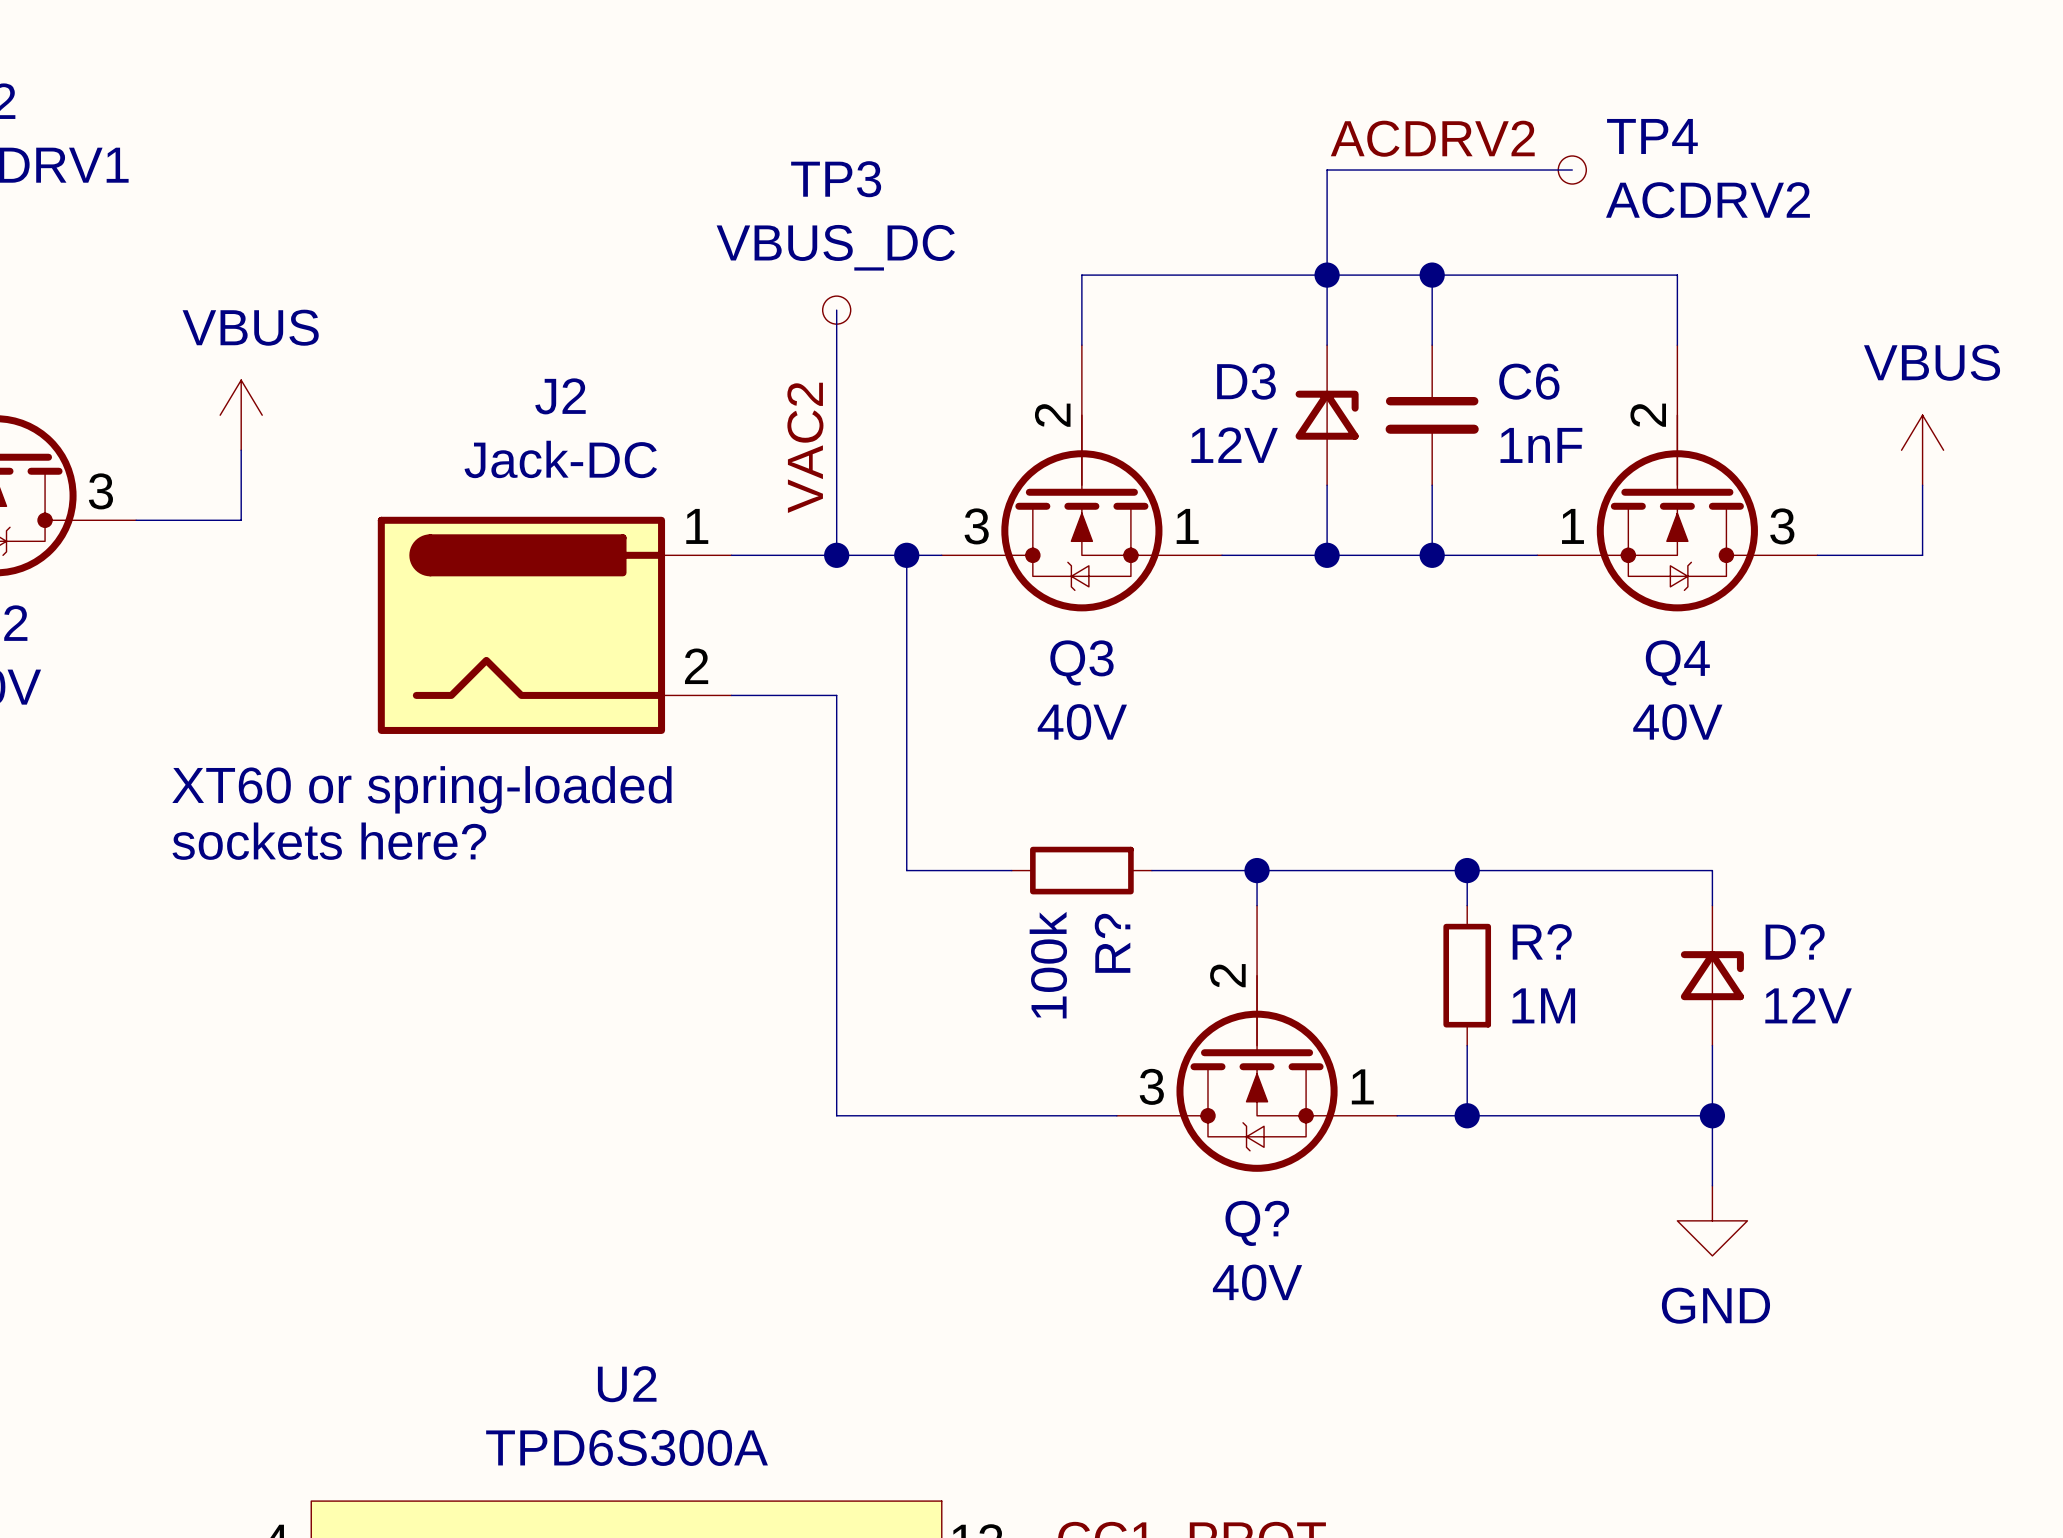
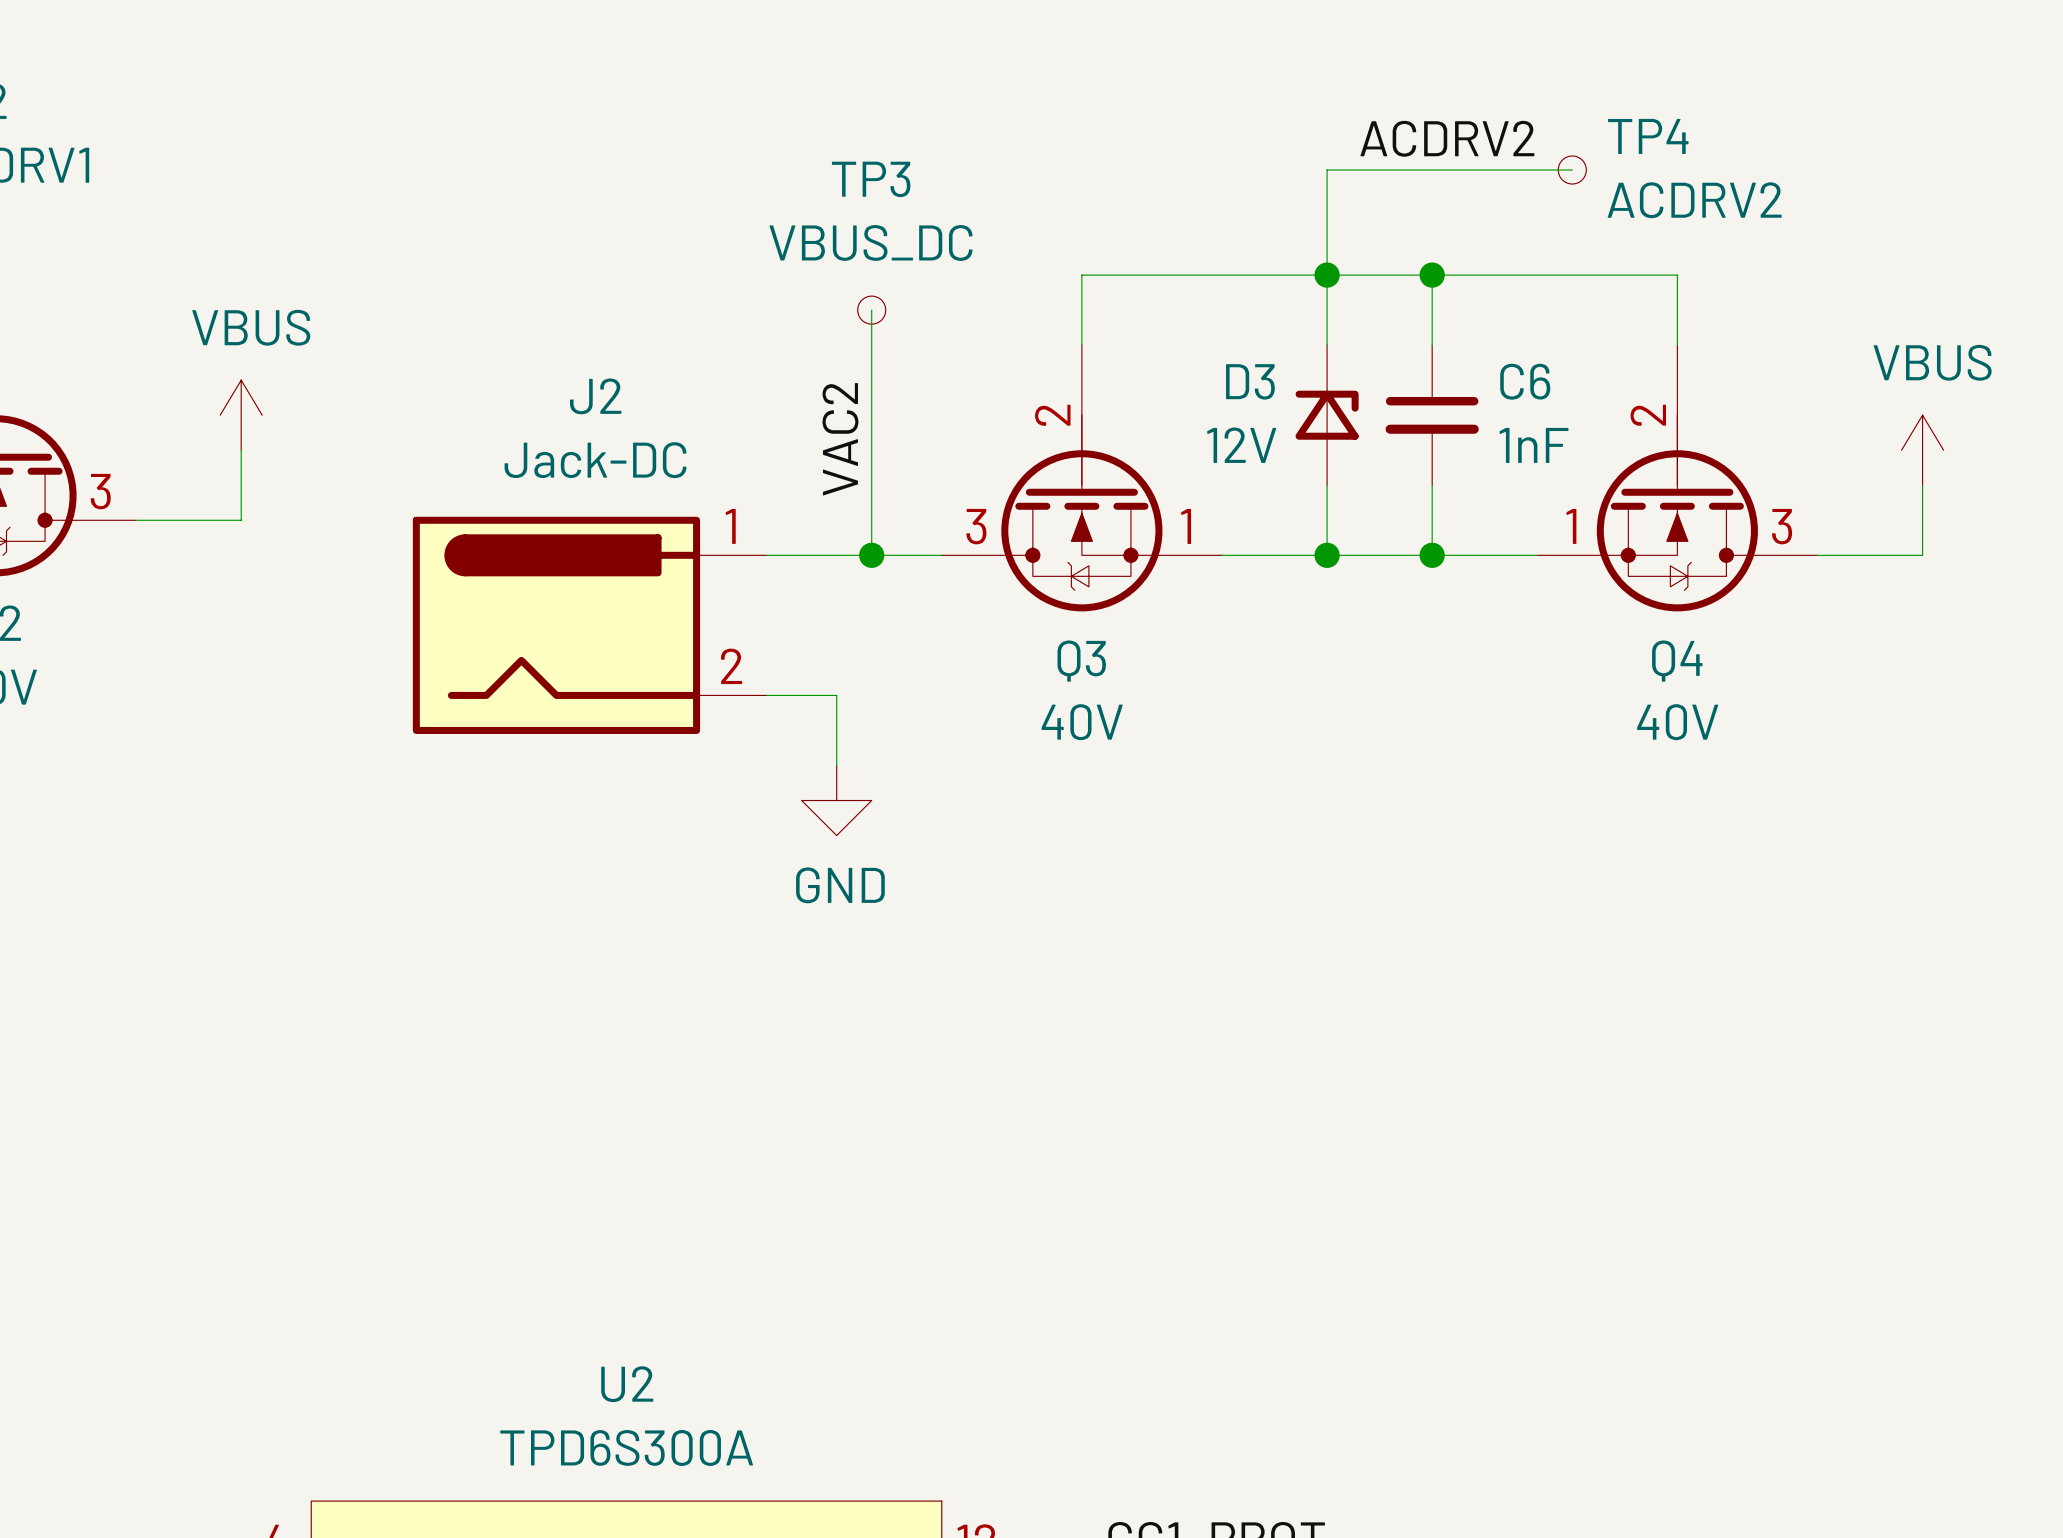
wire: (836, 310) (836, 555) -> (871, 310) (871, 555)
TP3 position: (836, 310) -> (871, 310)
label position: VAC2 (805, 447) -> VAC2 (840, 439)
junction: (836, 555) -> none
junction: none -> (871, 555)
wire: (906, 555) (906, 870) (1011, 870) -> none
junction: (906, 555) -> none
J2 position: (554, 625) -> (589, 625)
wire: (836, 765) (836, 1115) (1116, 1115) -> none
text: XT60 or spring-loaded (421, 789) -> none
power symbol: none -> GND (836, 800)
text: sockets here? (329, 841) -> none
R?: 100k (1081, 870) -> none
wire: (1151, 870) (1712, 870) (1712, 905) -> none
wire: (1257, 870) (1257, 905) -> none
junction: (1257, 870) -> none
wire: (1467, 870) (1467, 905) -> none
junction: (1467, 870) -> none
R?: 1M (1467, 975) -> none
D?: 12V (1712, 975) -> none
Q?: 40V (1257, 1038) -> none
wire: (1467, 1045) (1467, 1115) -> none
wire: (1712, 1045) (1712, 1185) -> none
wire: (1397, 1115) (1712, 1115) -> none
junction: (1467, 1115) -> none
junction: (1712, 1115) -> none
power symbol: GND (1712, 1220) -> none

